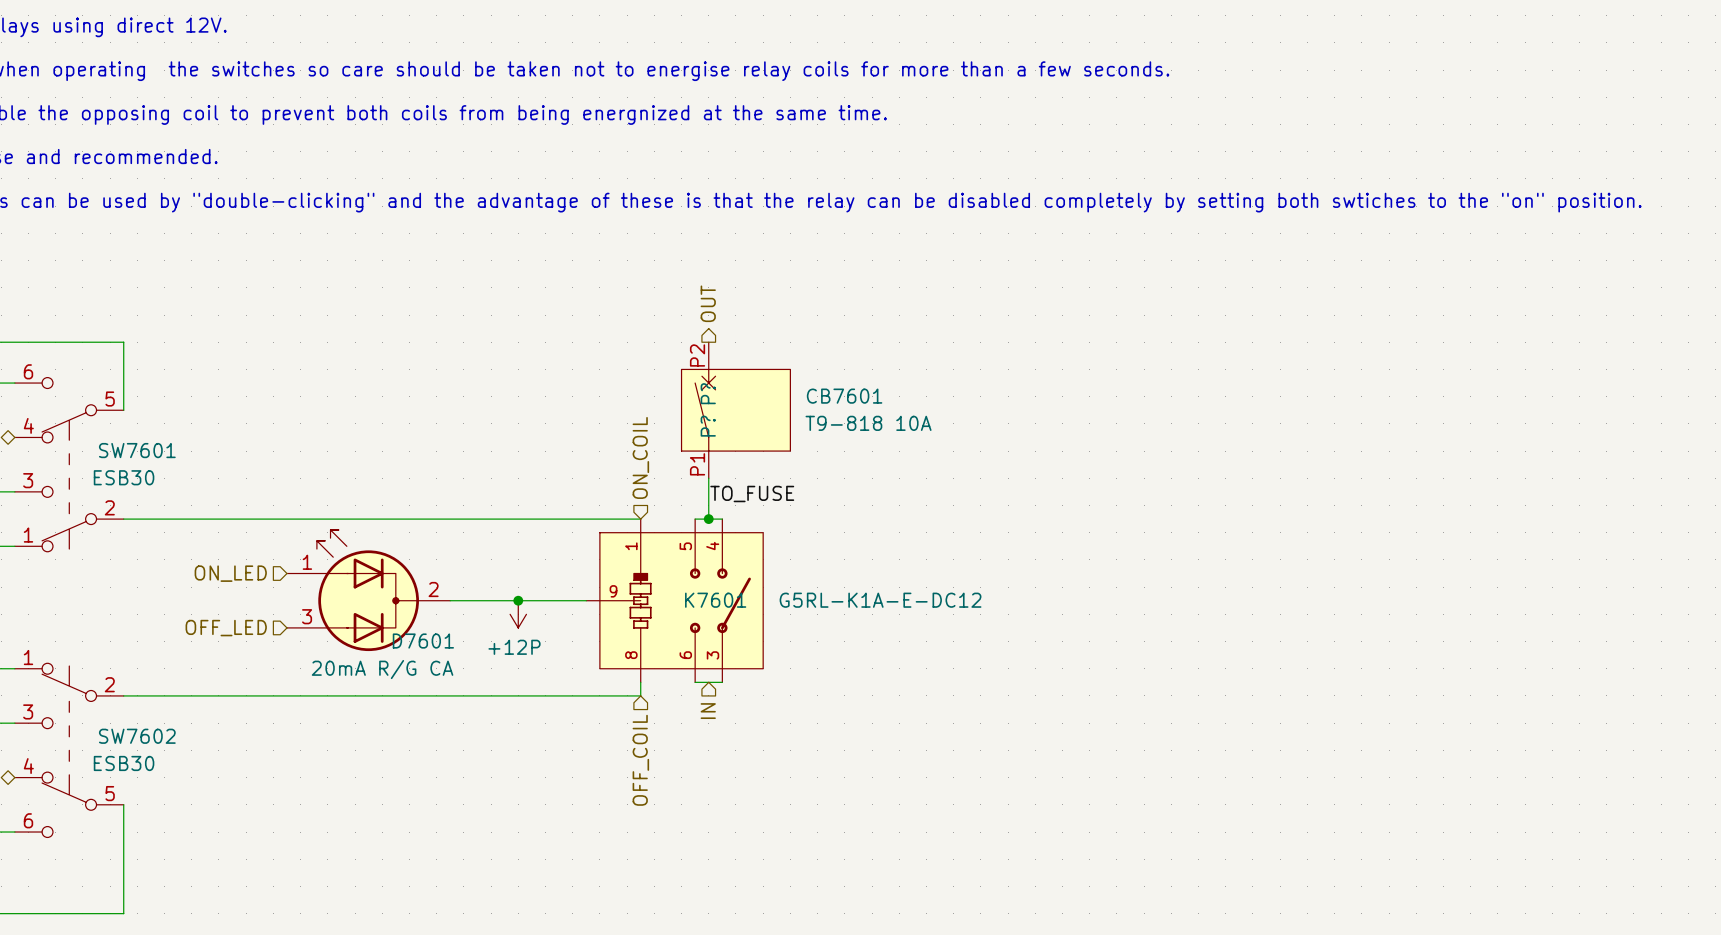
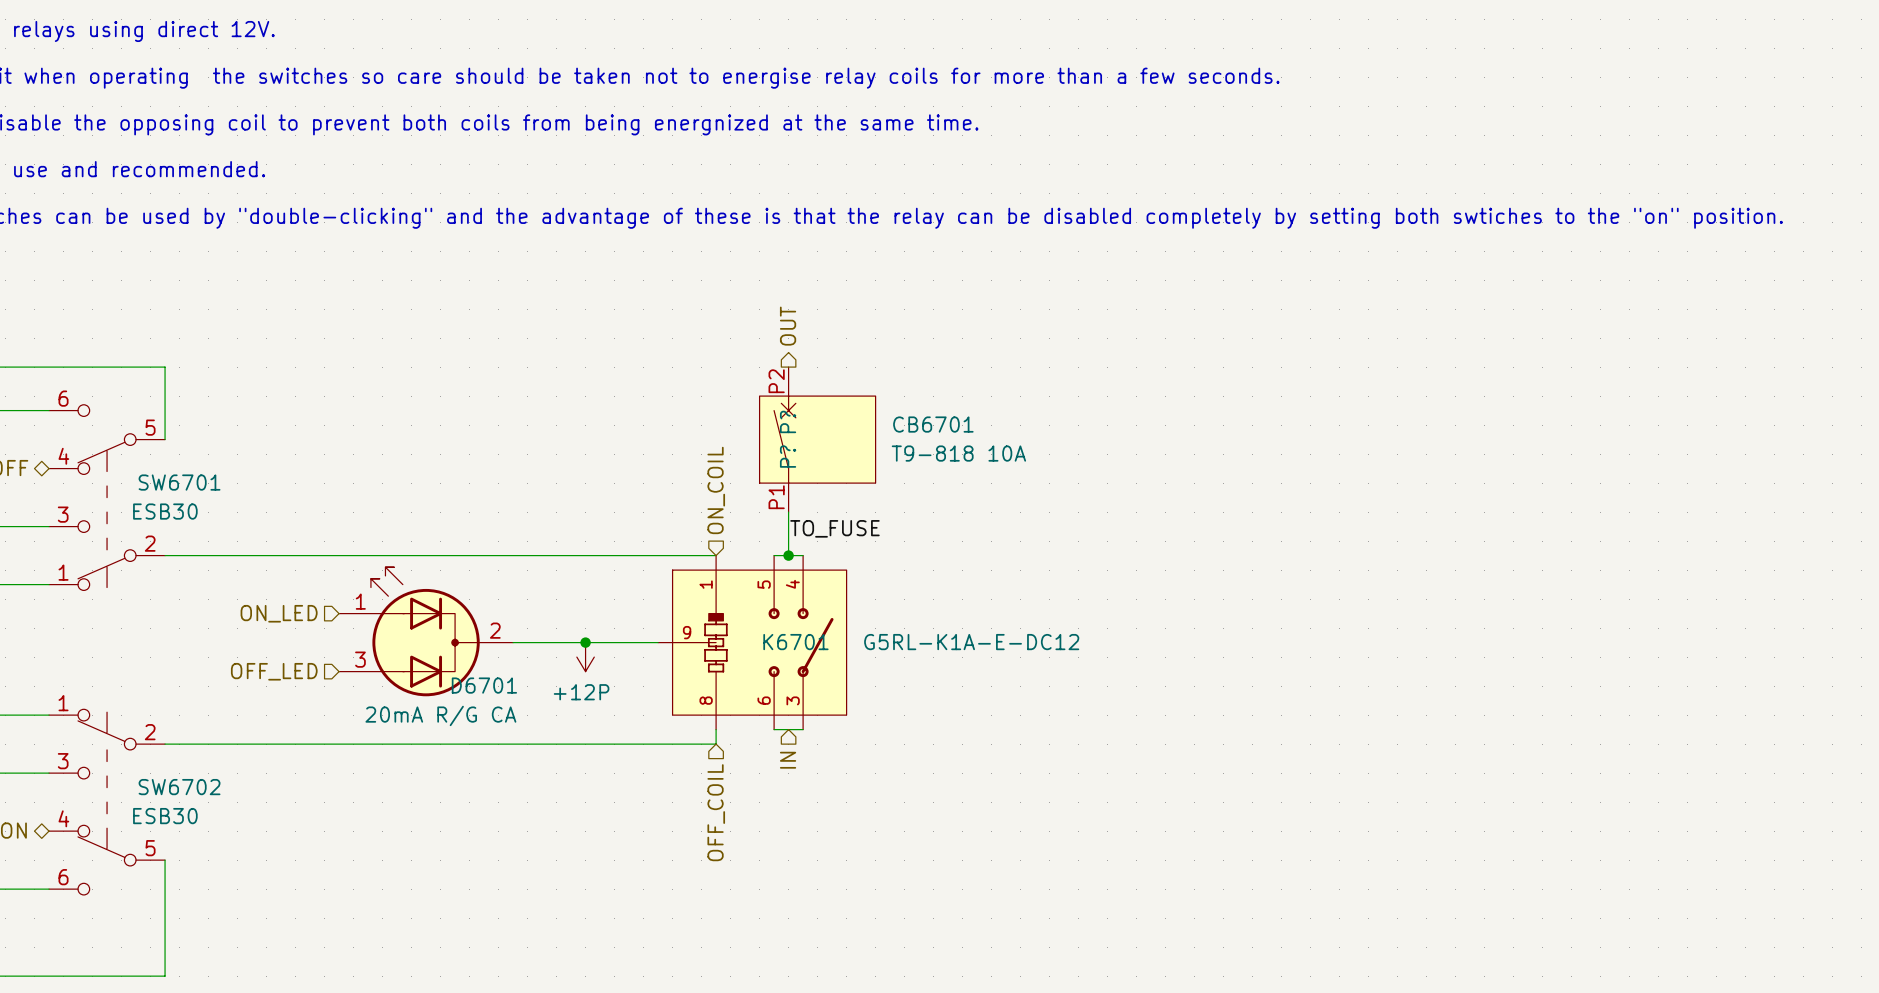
CB7601 name: CB7601 (844, 396) -> CB6701 (933, 424)
SW7601 name: SW7601 (137, 450) -> SW6701 (179, 482)
K7601 name: K7601 (715, 600) -> K6701 (795, 642)
D7601 name: D7601 (423, 641) -> D6701 (484, 685)
SW7602 name: SW7602 (137, 736) -> SW6702 (179, 787)

